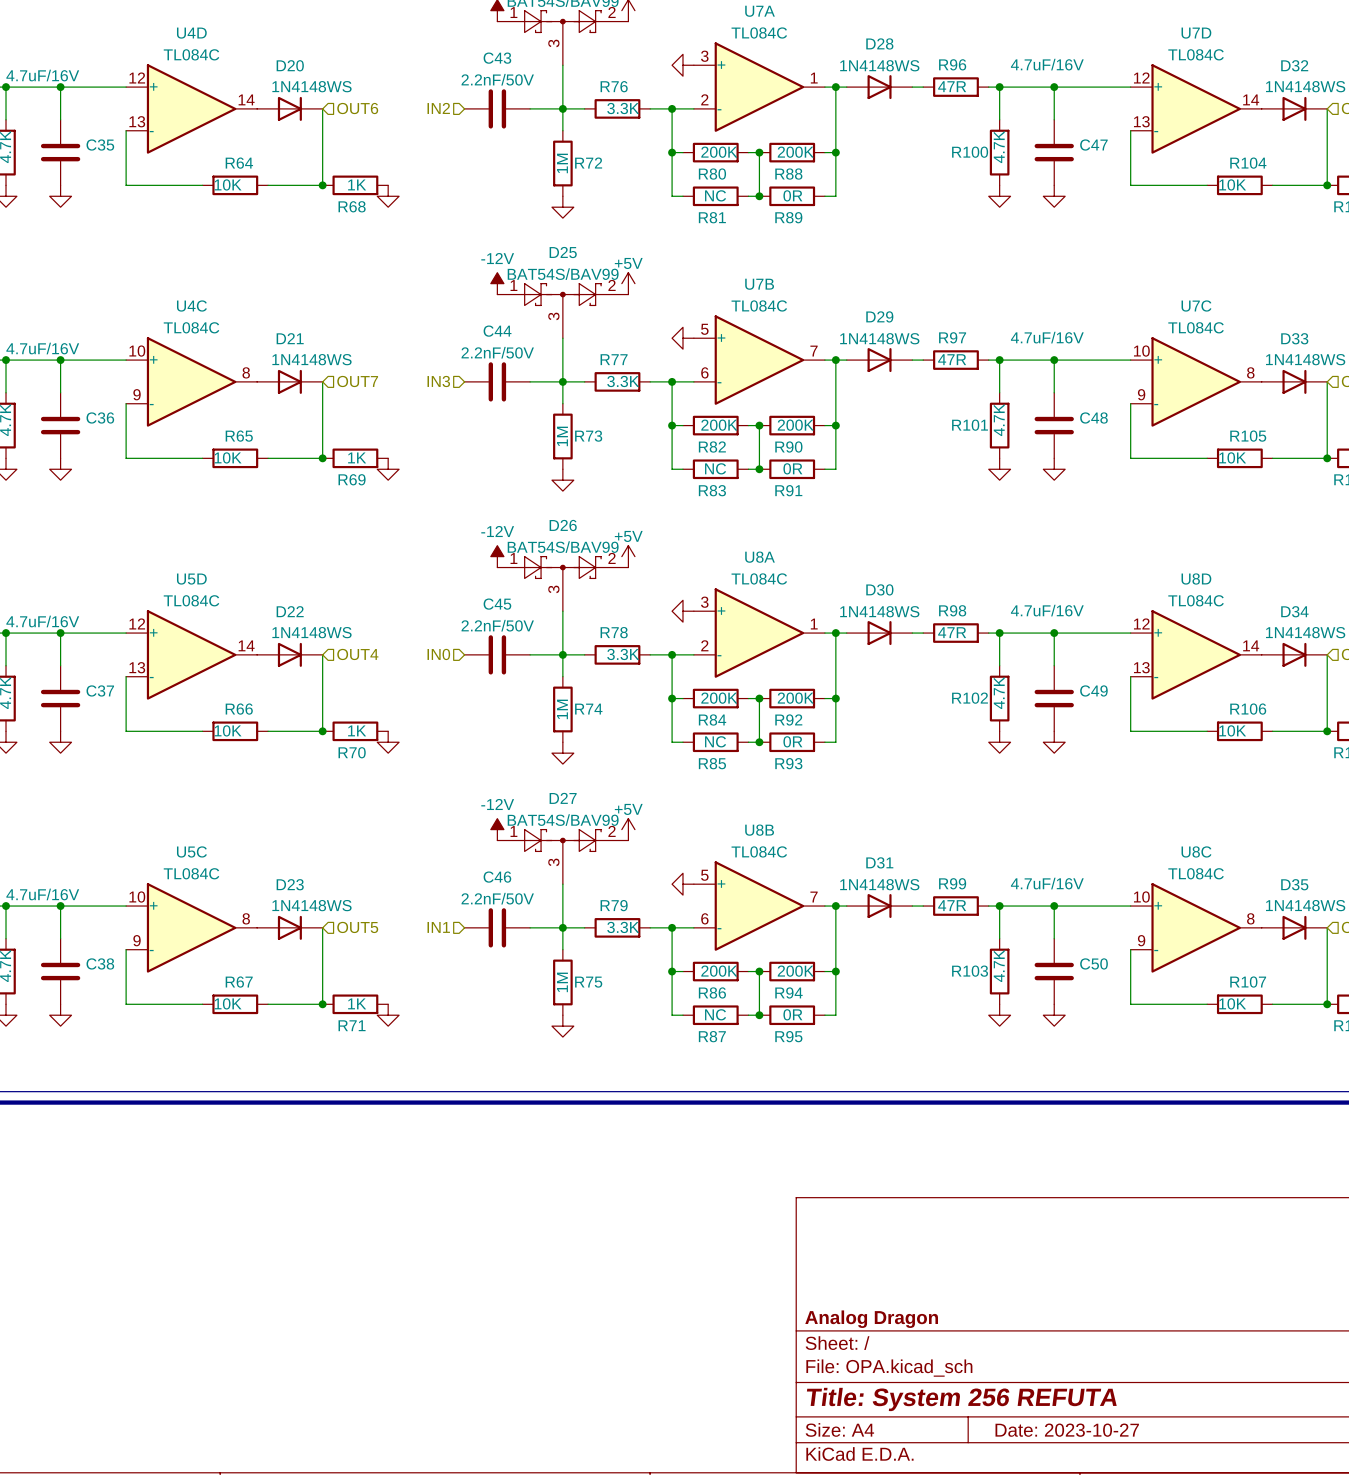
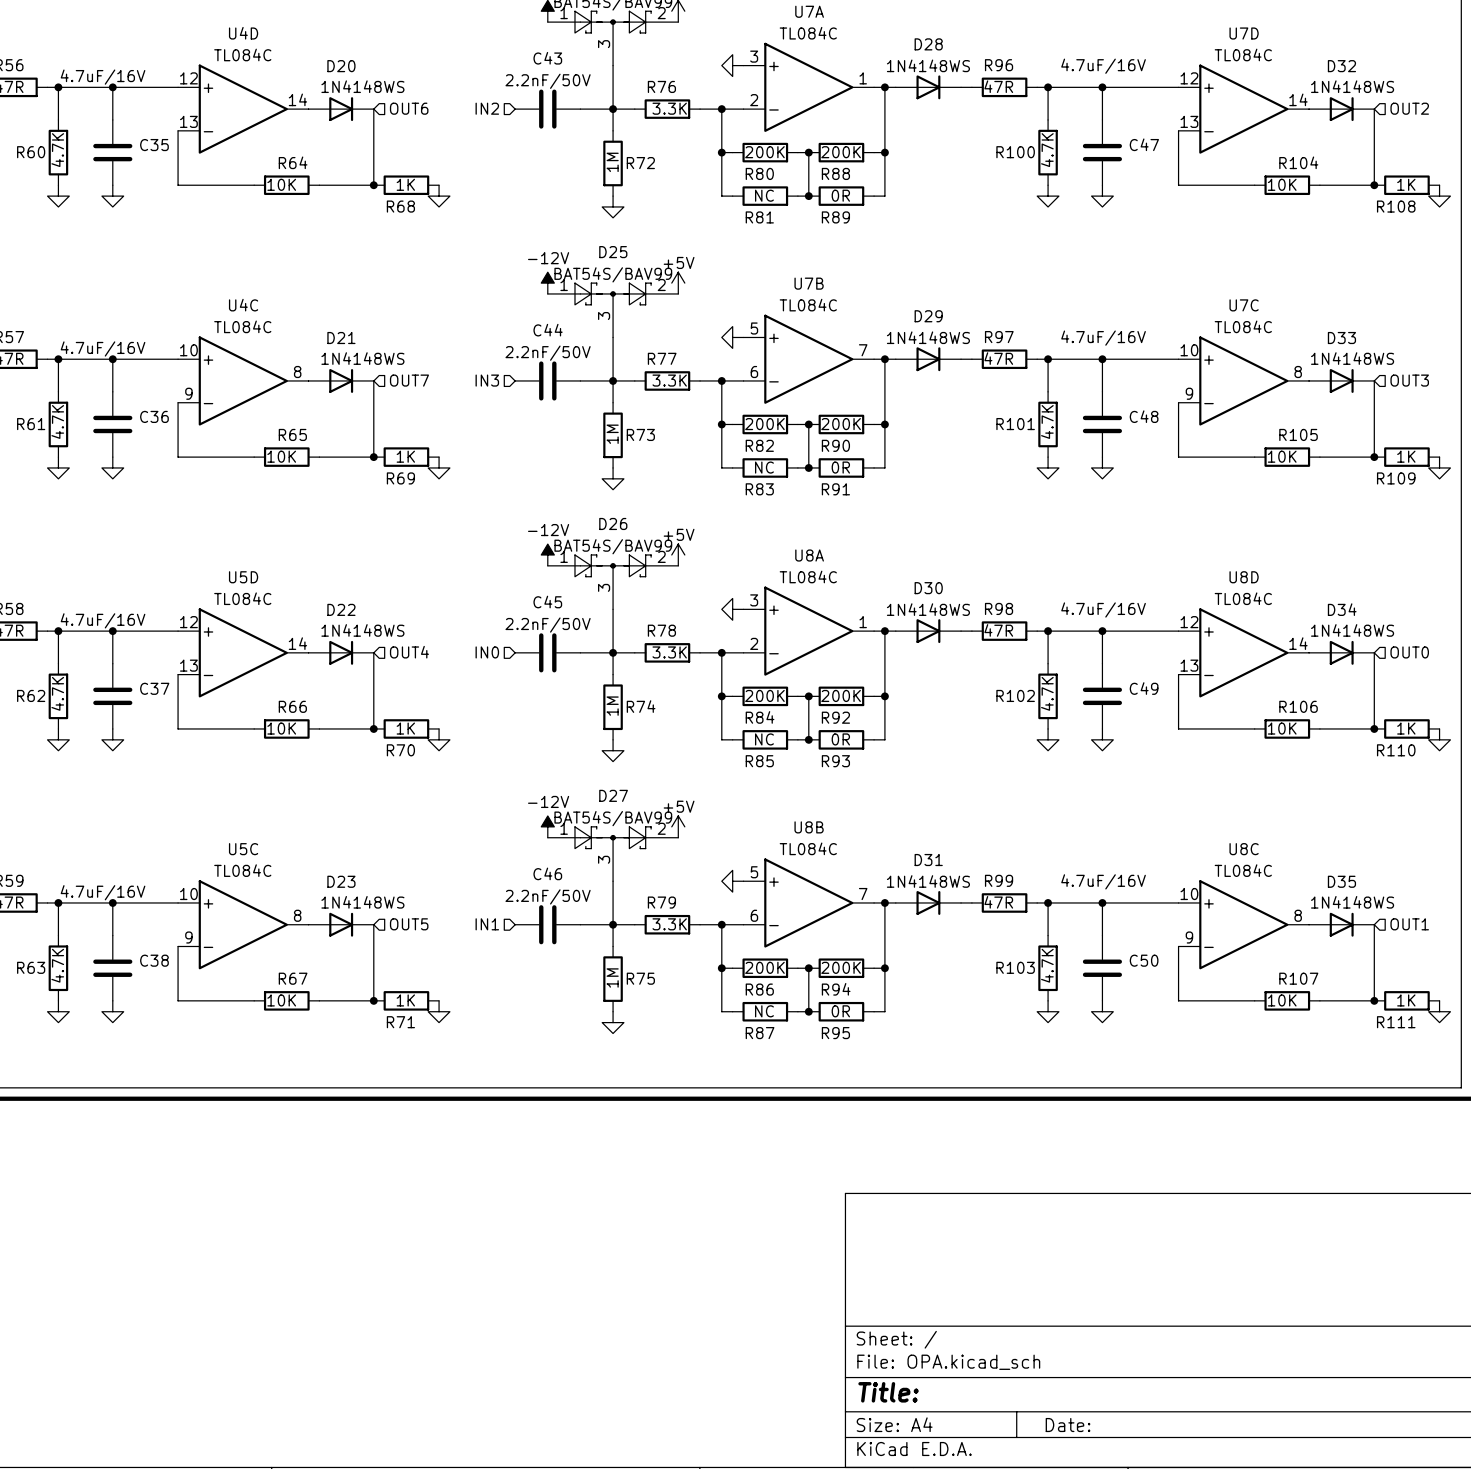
title block: Analog Dragon (871, 1319) -> none
title block: Title: System 256 REFUTA (961, 1399) -> Title: (888, 1392)
title block: Date: 2023-10-27 (1067, 1430) -> Date: (1068, 1425)

